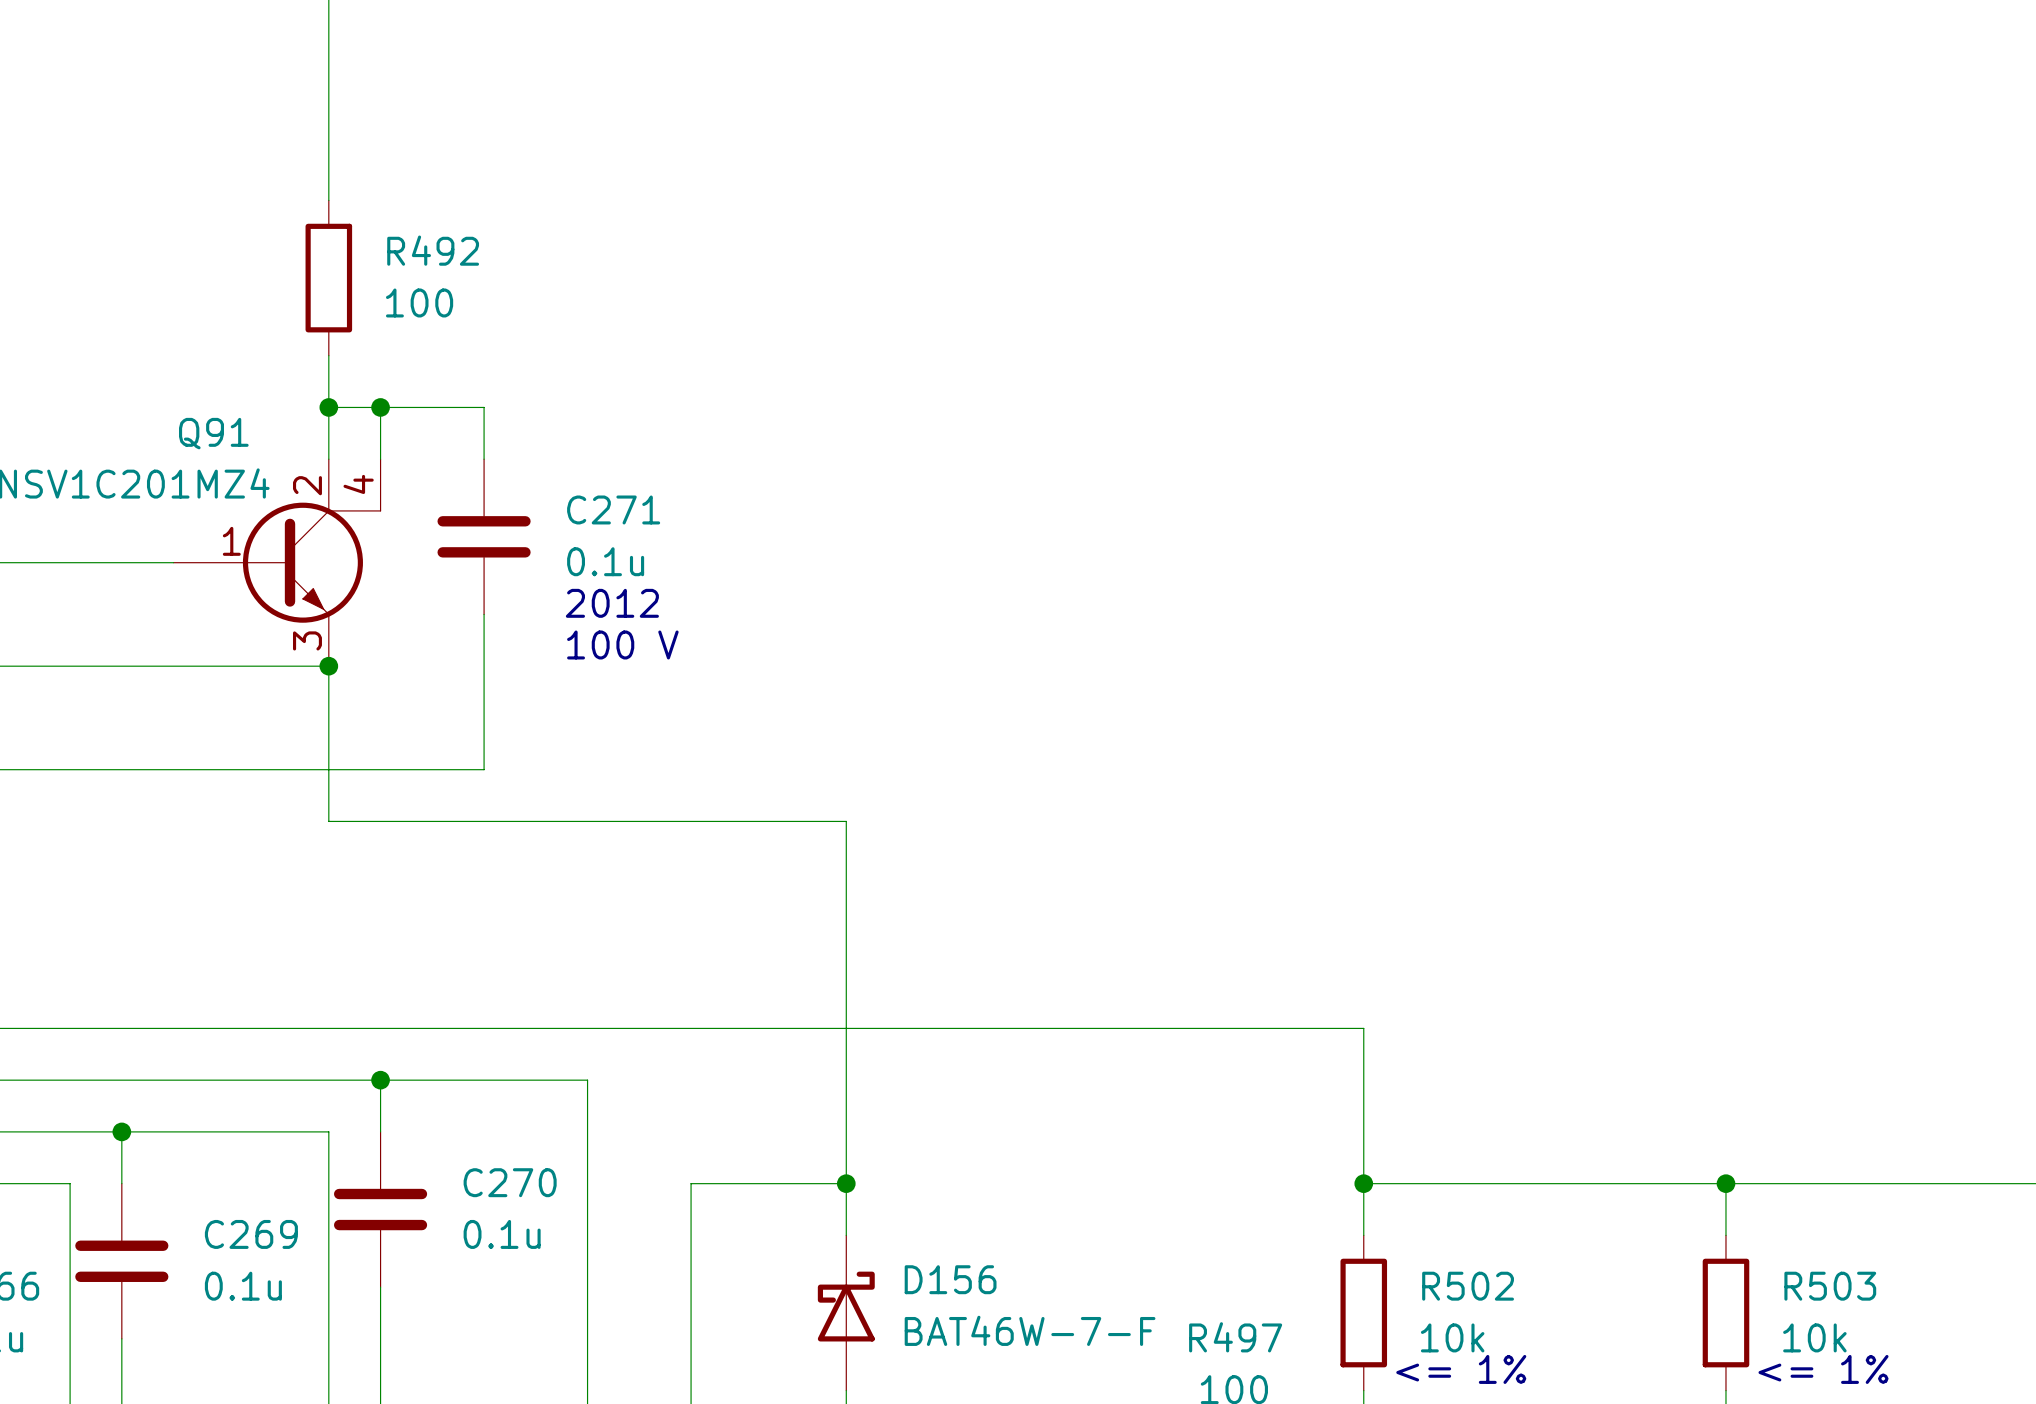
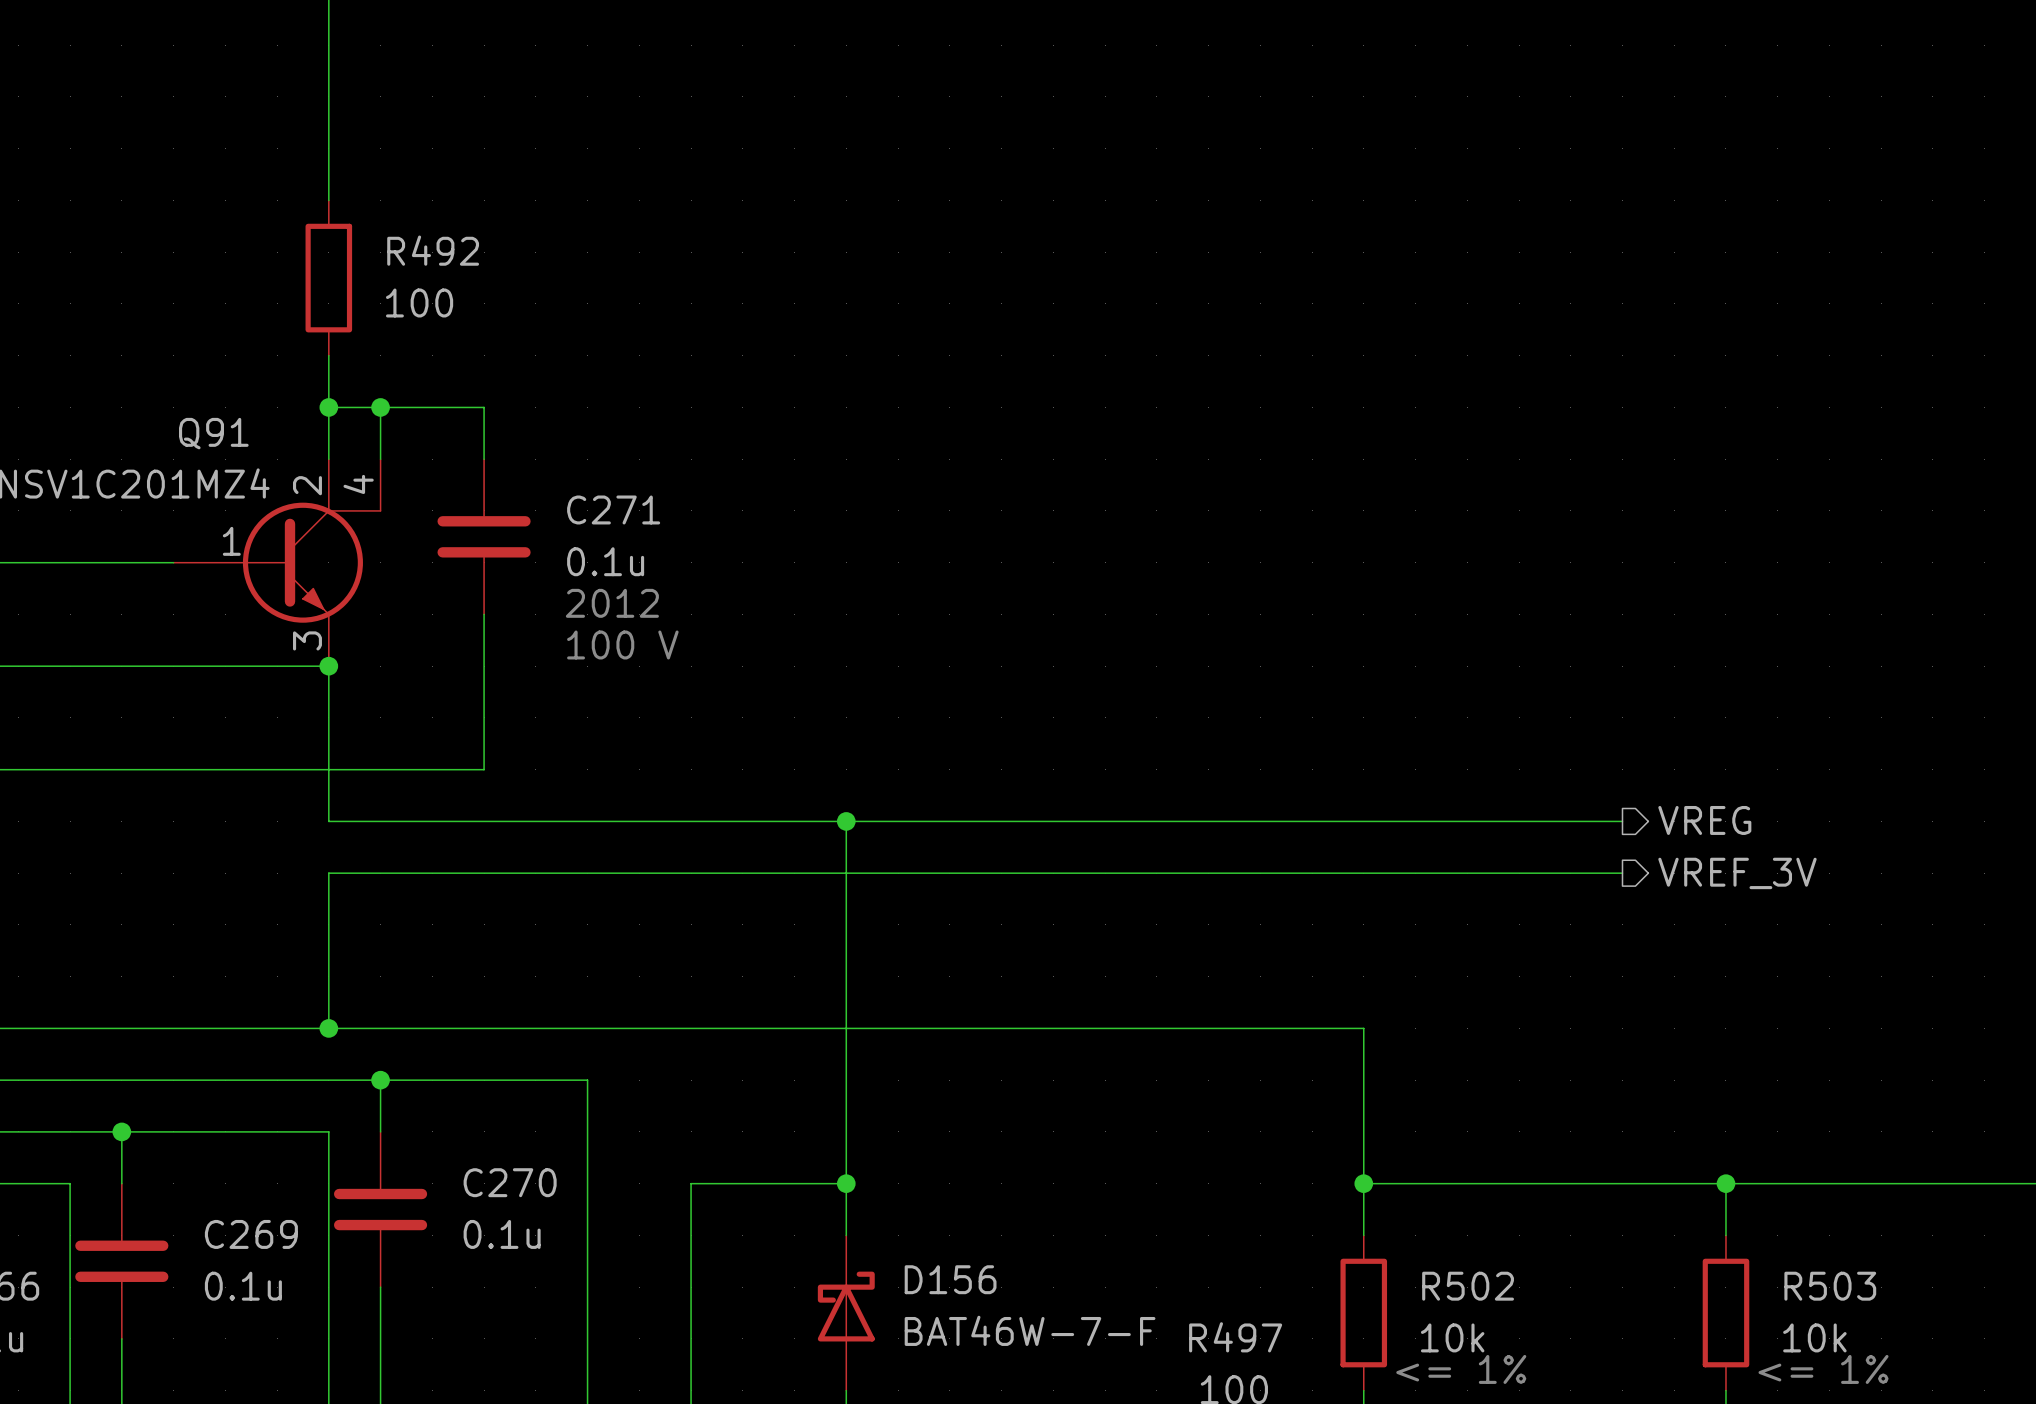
hierarchical label: none -> VREG (1704, 820)
wire: none -> (846, 821) (1622, 821)
junction: none -> (846, 821)
wire: none -> (1622, 873) (328, 873) (328, 1028)
hierarchical label: none -> VREF_3V (1737, 873)
junction: none -> (328, 1028)

